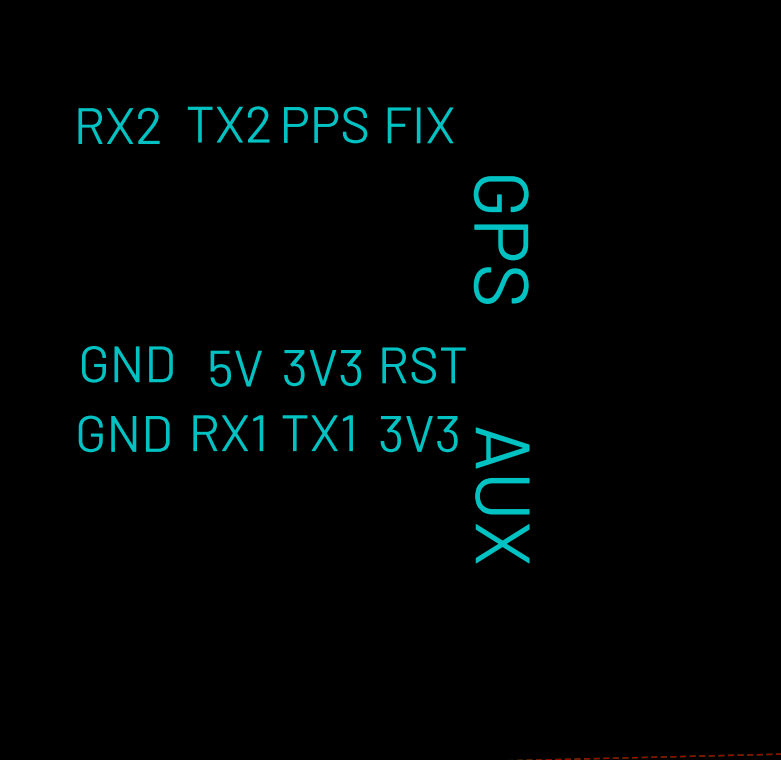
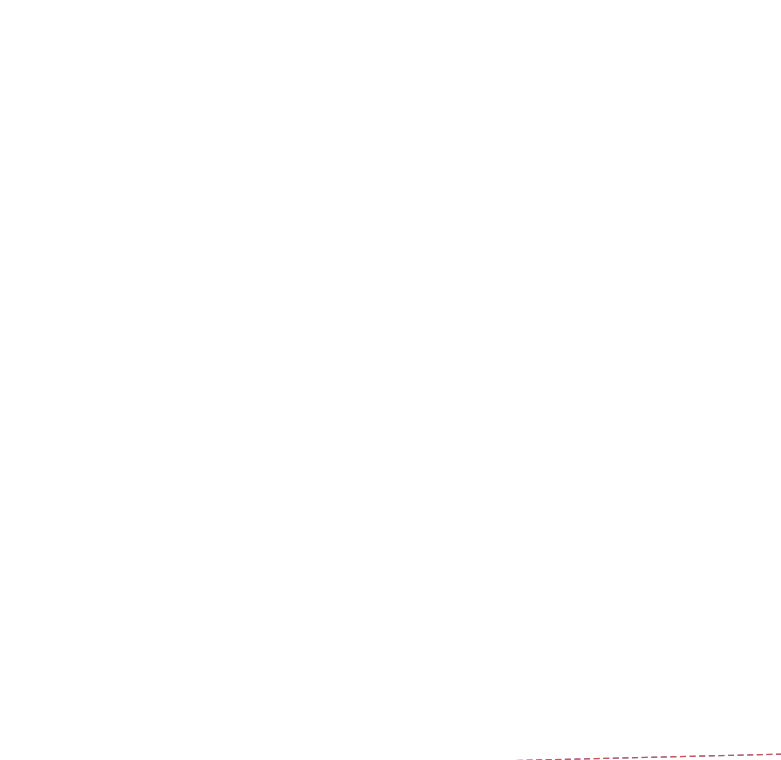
text: TX2 (228, 124) -> none
text: RX2 (119, 125) -> none
text: PPS (325, 125) -> none
text: FIX (420, 125) -> none
text: GPS (501, 240) -> none
text: GND (127, 364) -> none
text: RST (424, 365) -> none
text: 5V (236, 368) -> none
text: 3V3 (322, 368) -> none
text: GND (124, 433) -> none
text: RX1 (228, 433) -> none
text: TX1 (317, 433) -> none
text: 3V3 (419, 434) -> none
text: AUX (502, 495) -> none

